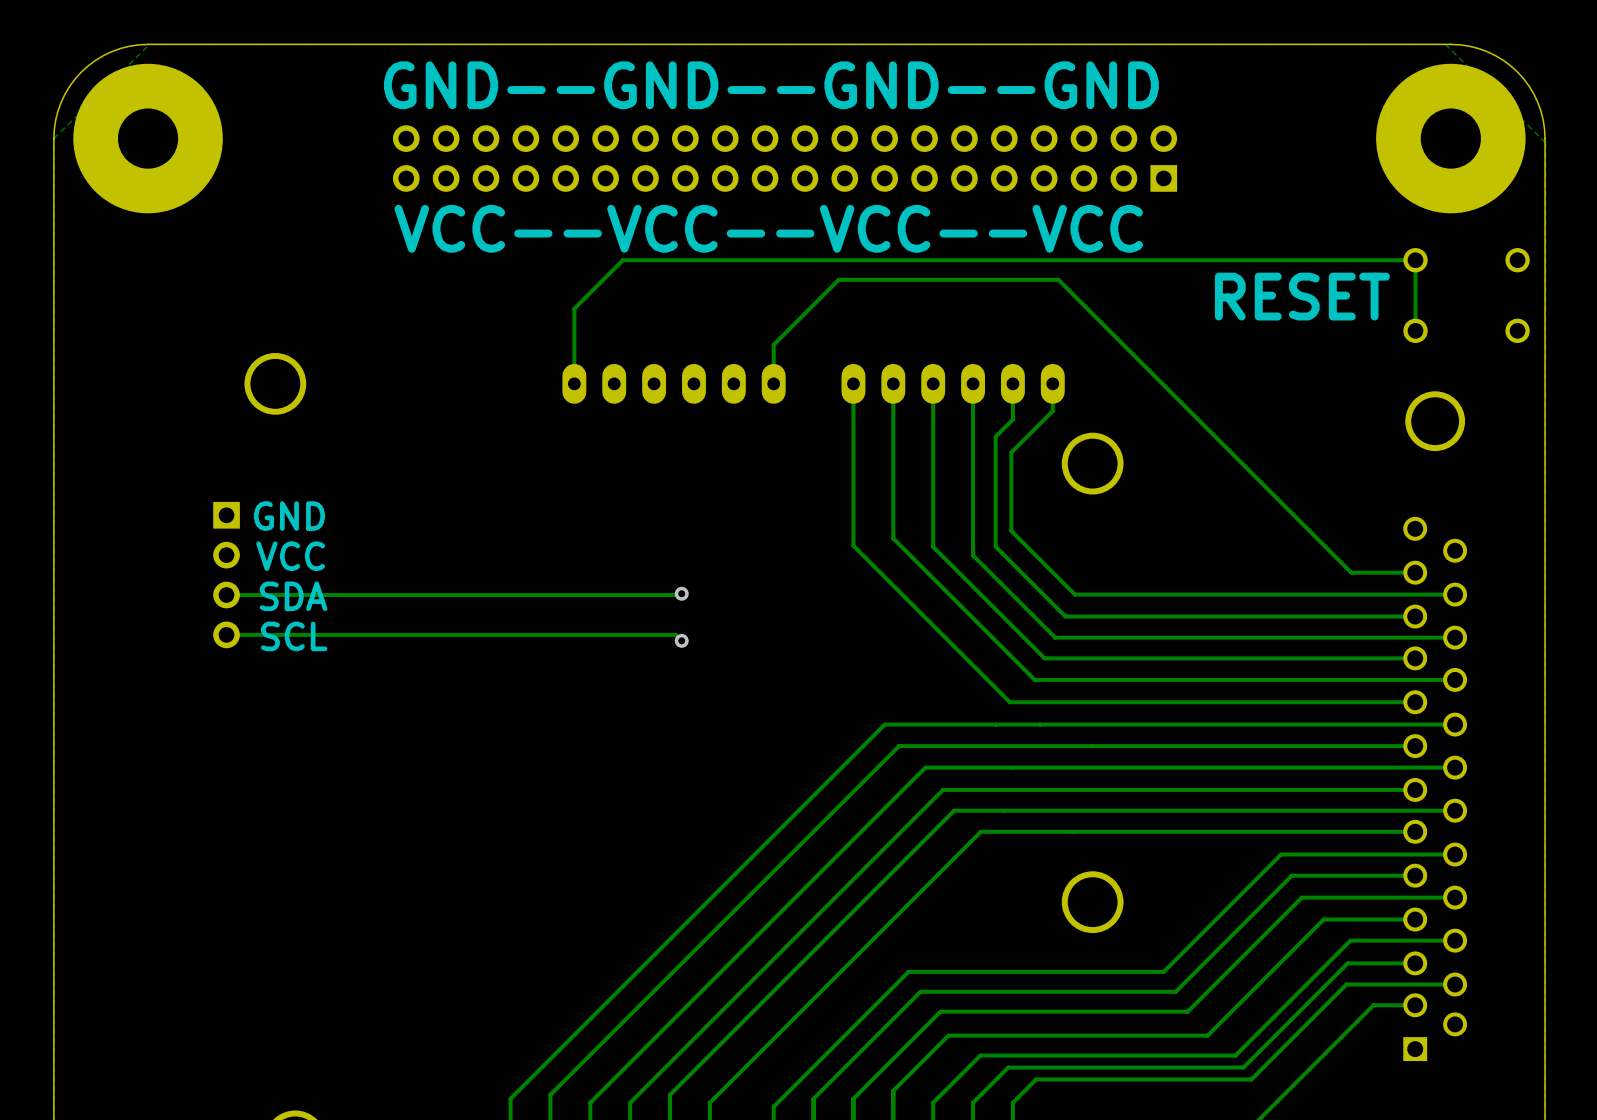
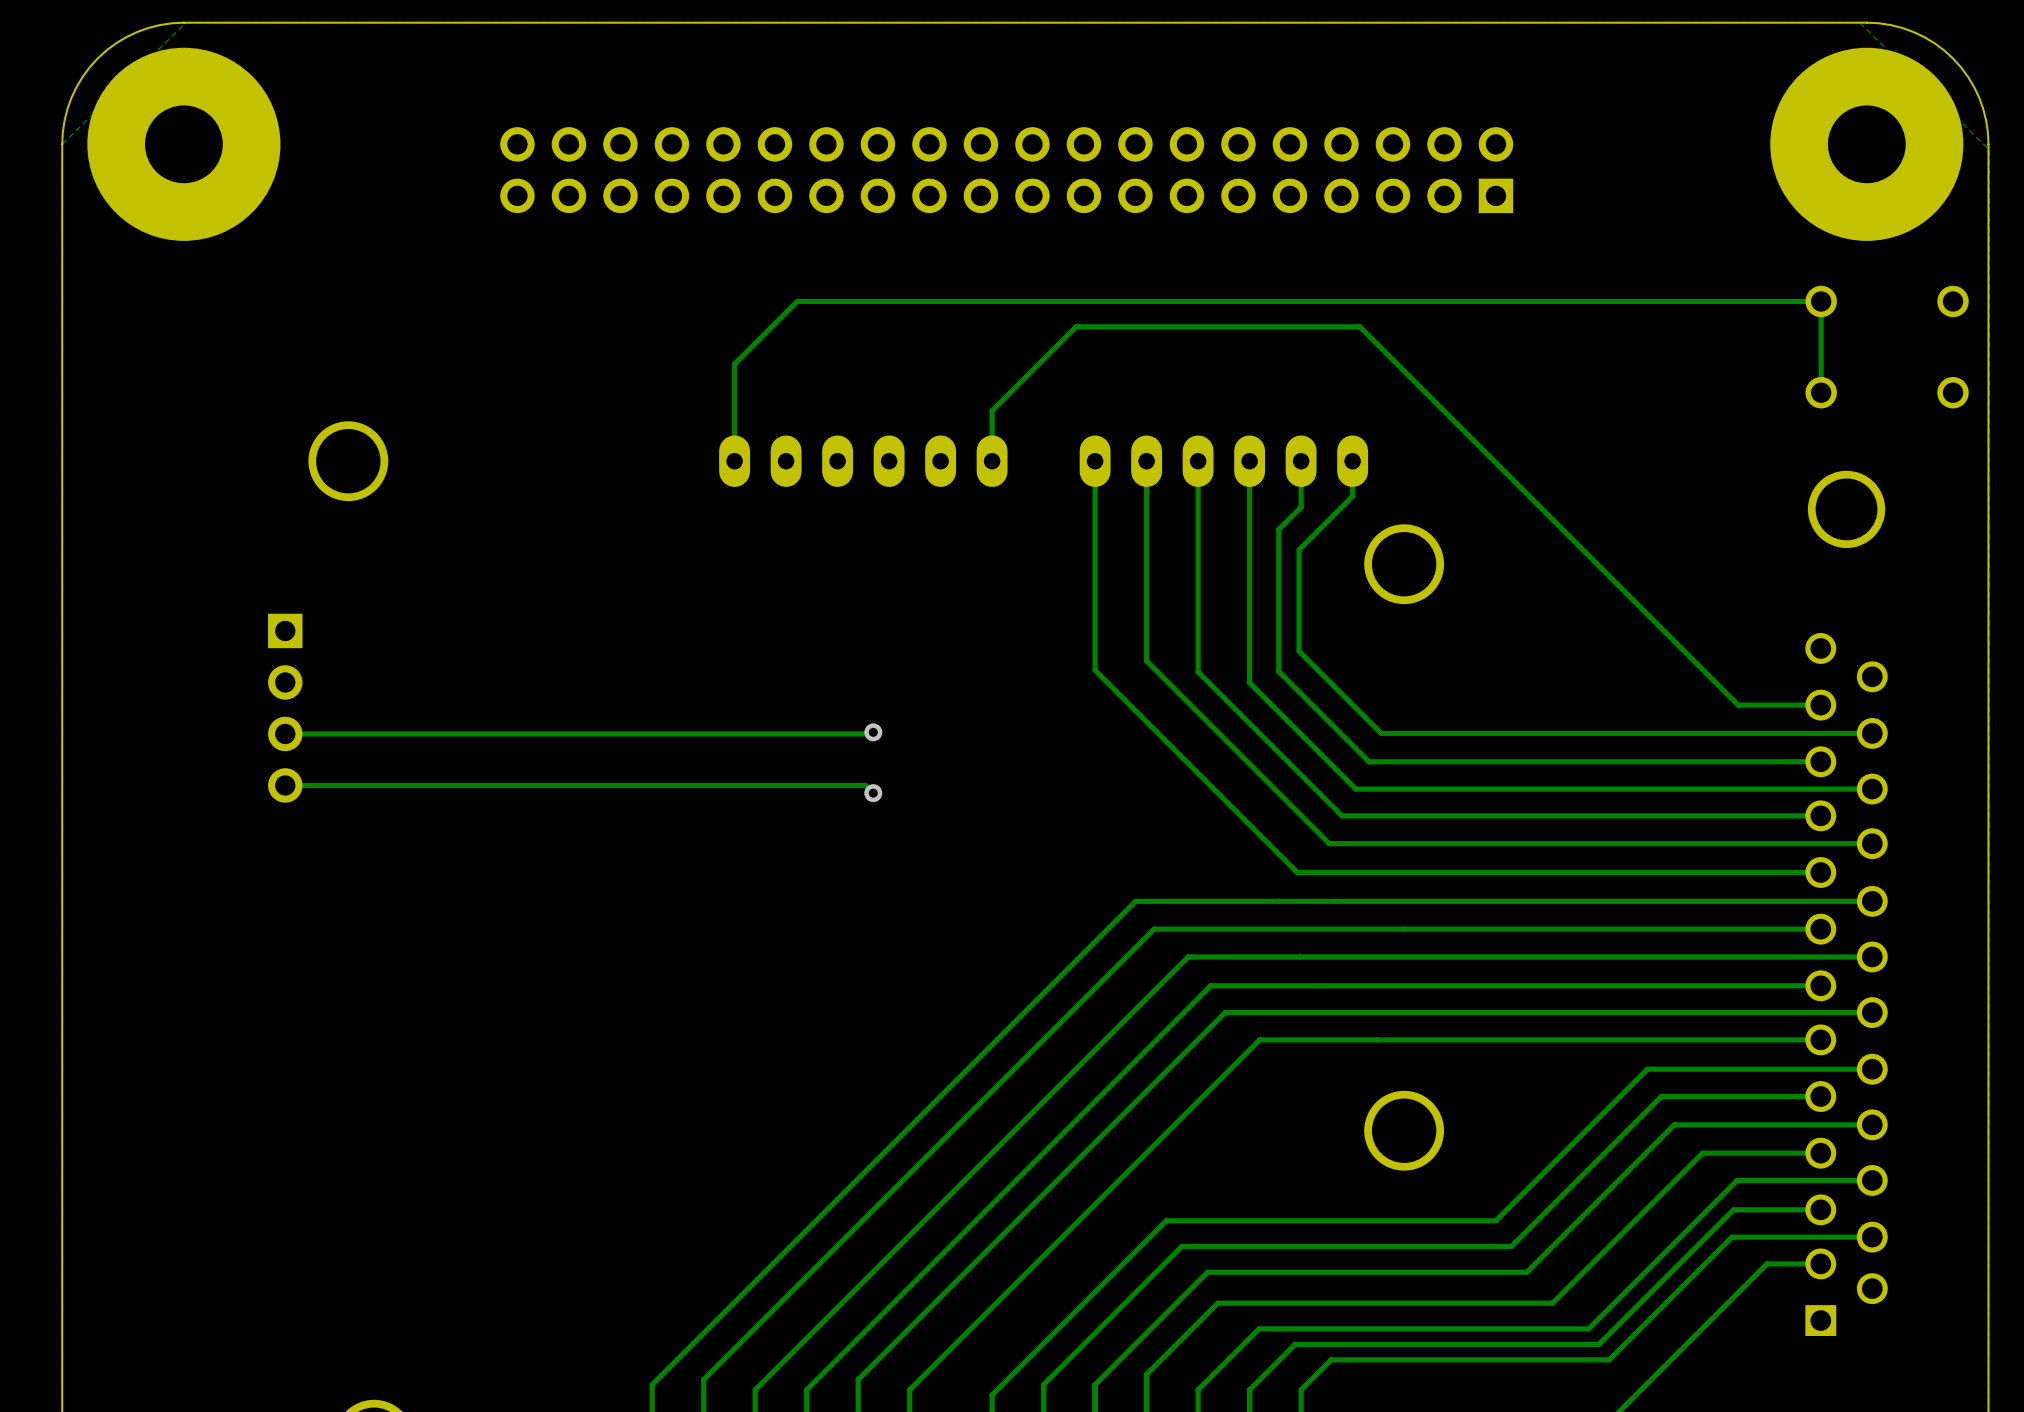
text: GND--GND--GND--GND (771, 85) -> none
text: VCC--VCC--VCC--VCC (768, 228) -> none
text: RESET (1302, 296) -> none
text: GND (289, 516) -> none
text: VCC (290, 556) -> none
text: SDA (293, 596) -> none
text: SCL (294, 636) -> none

